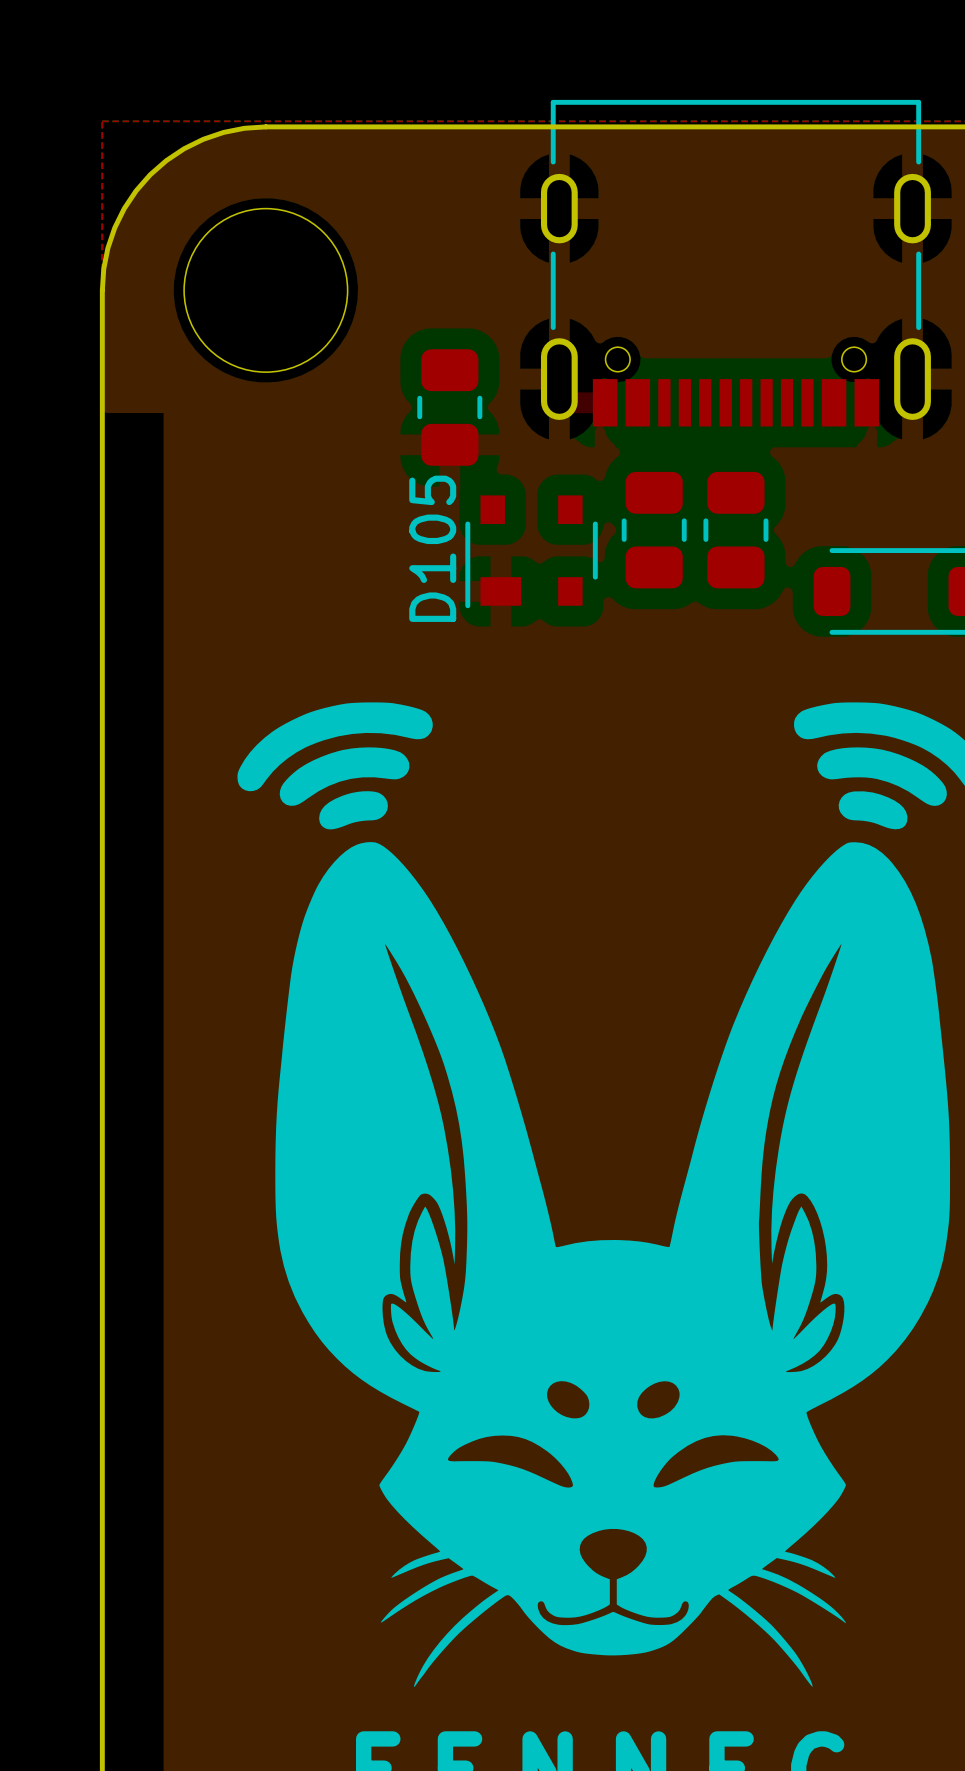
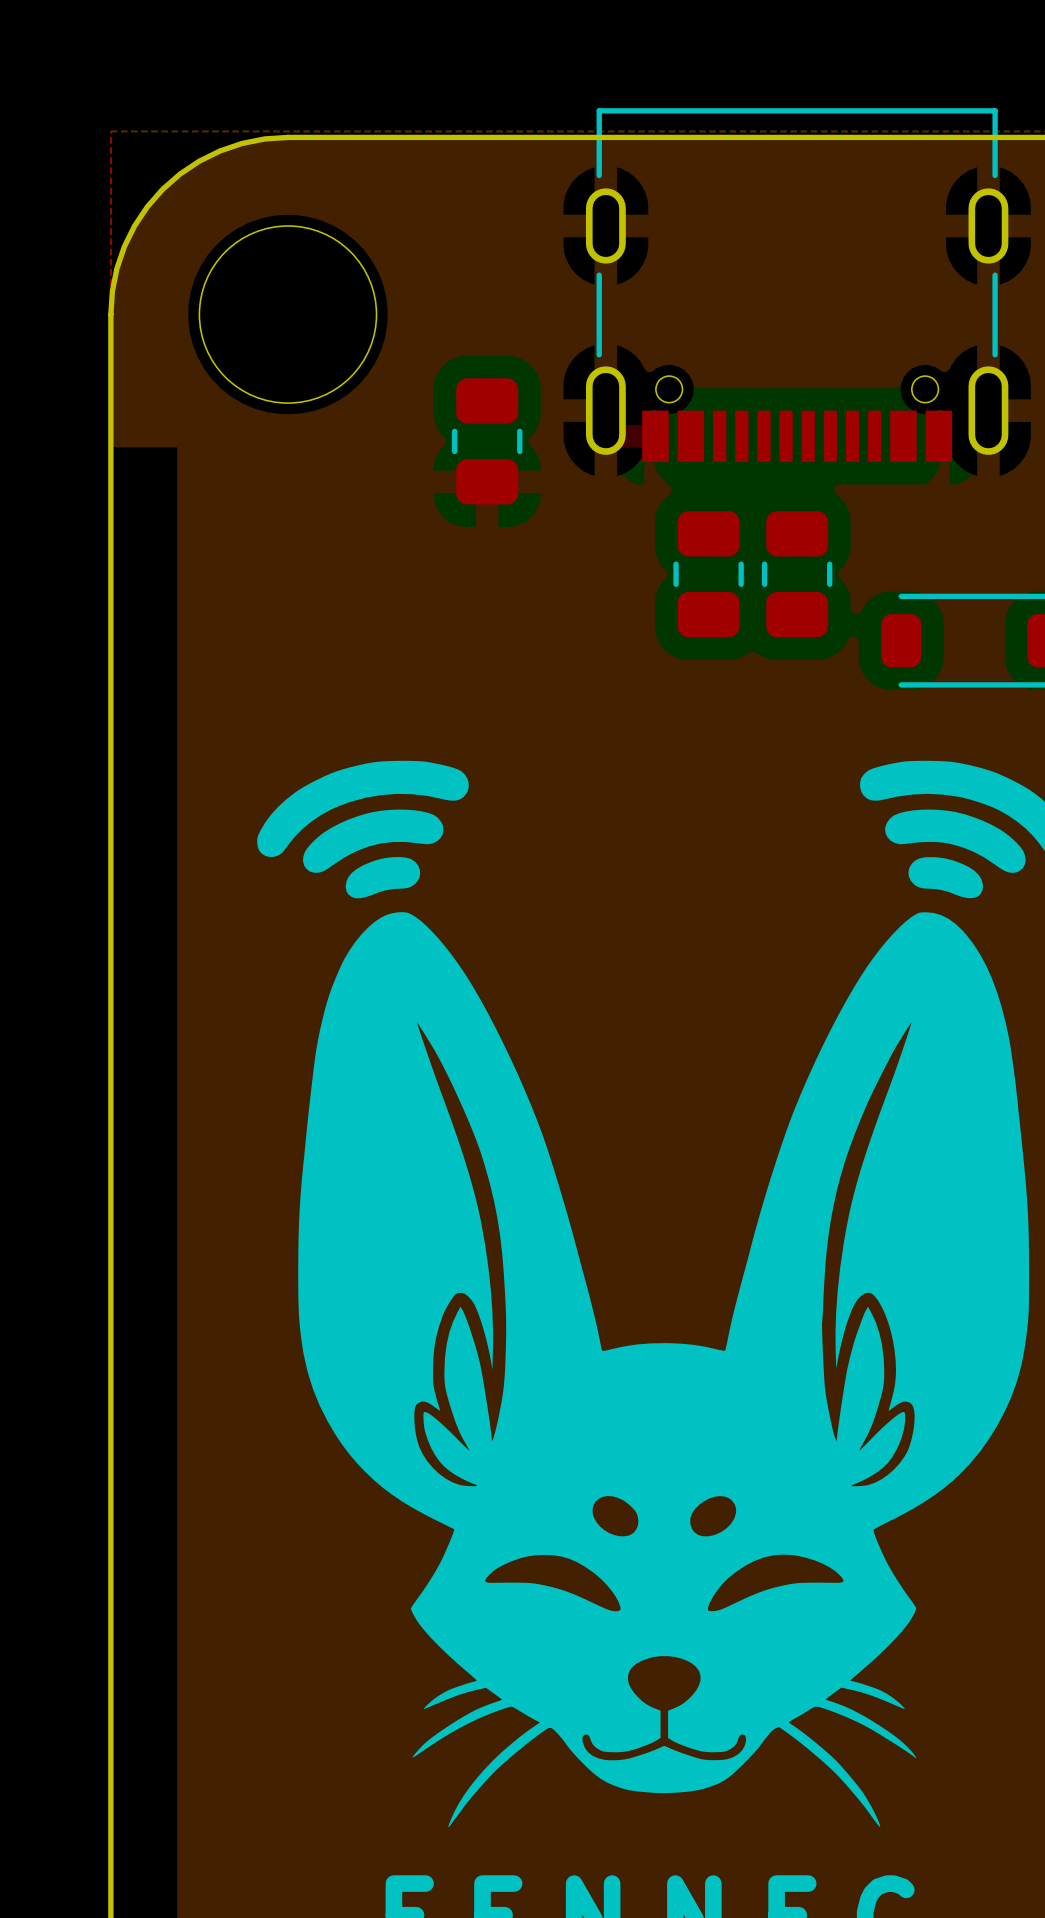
D105: (531, 551) -> none

